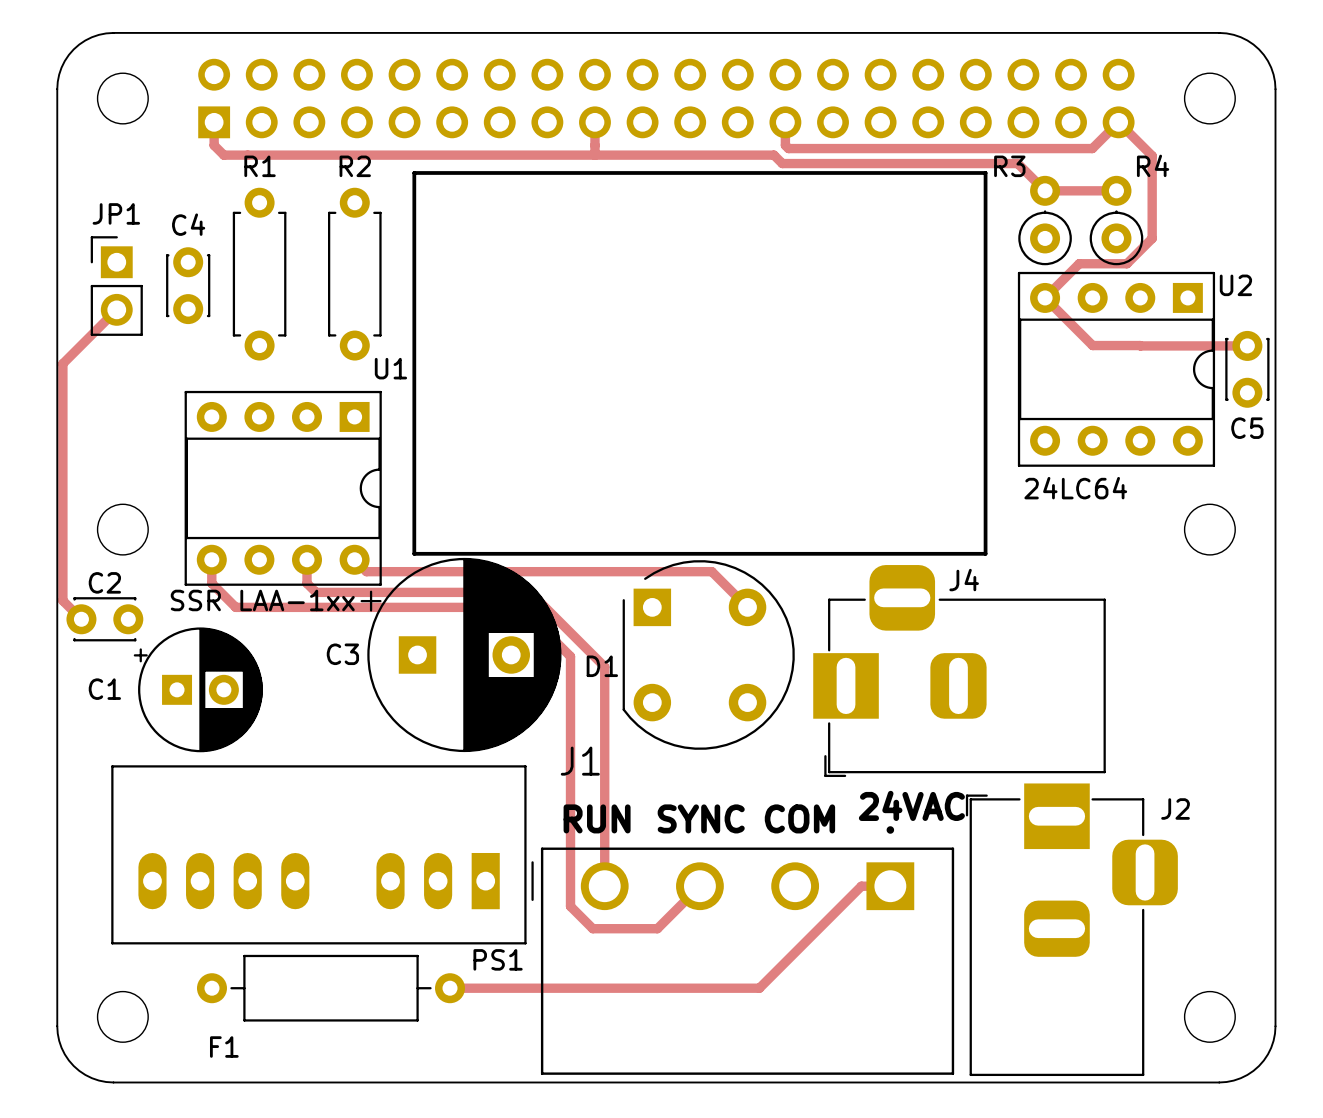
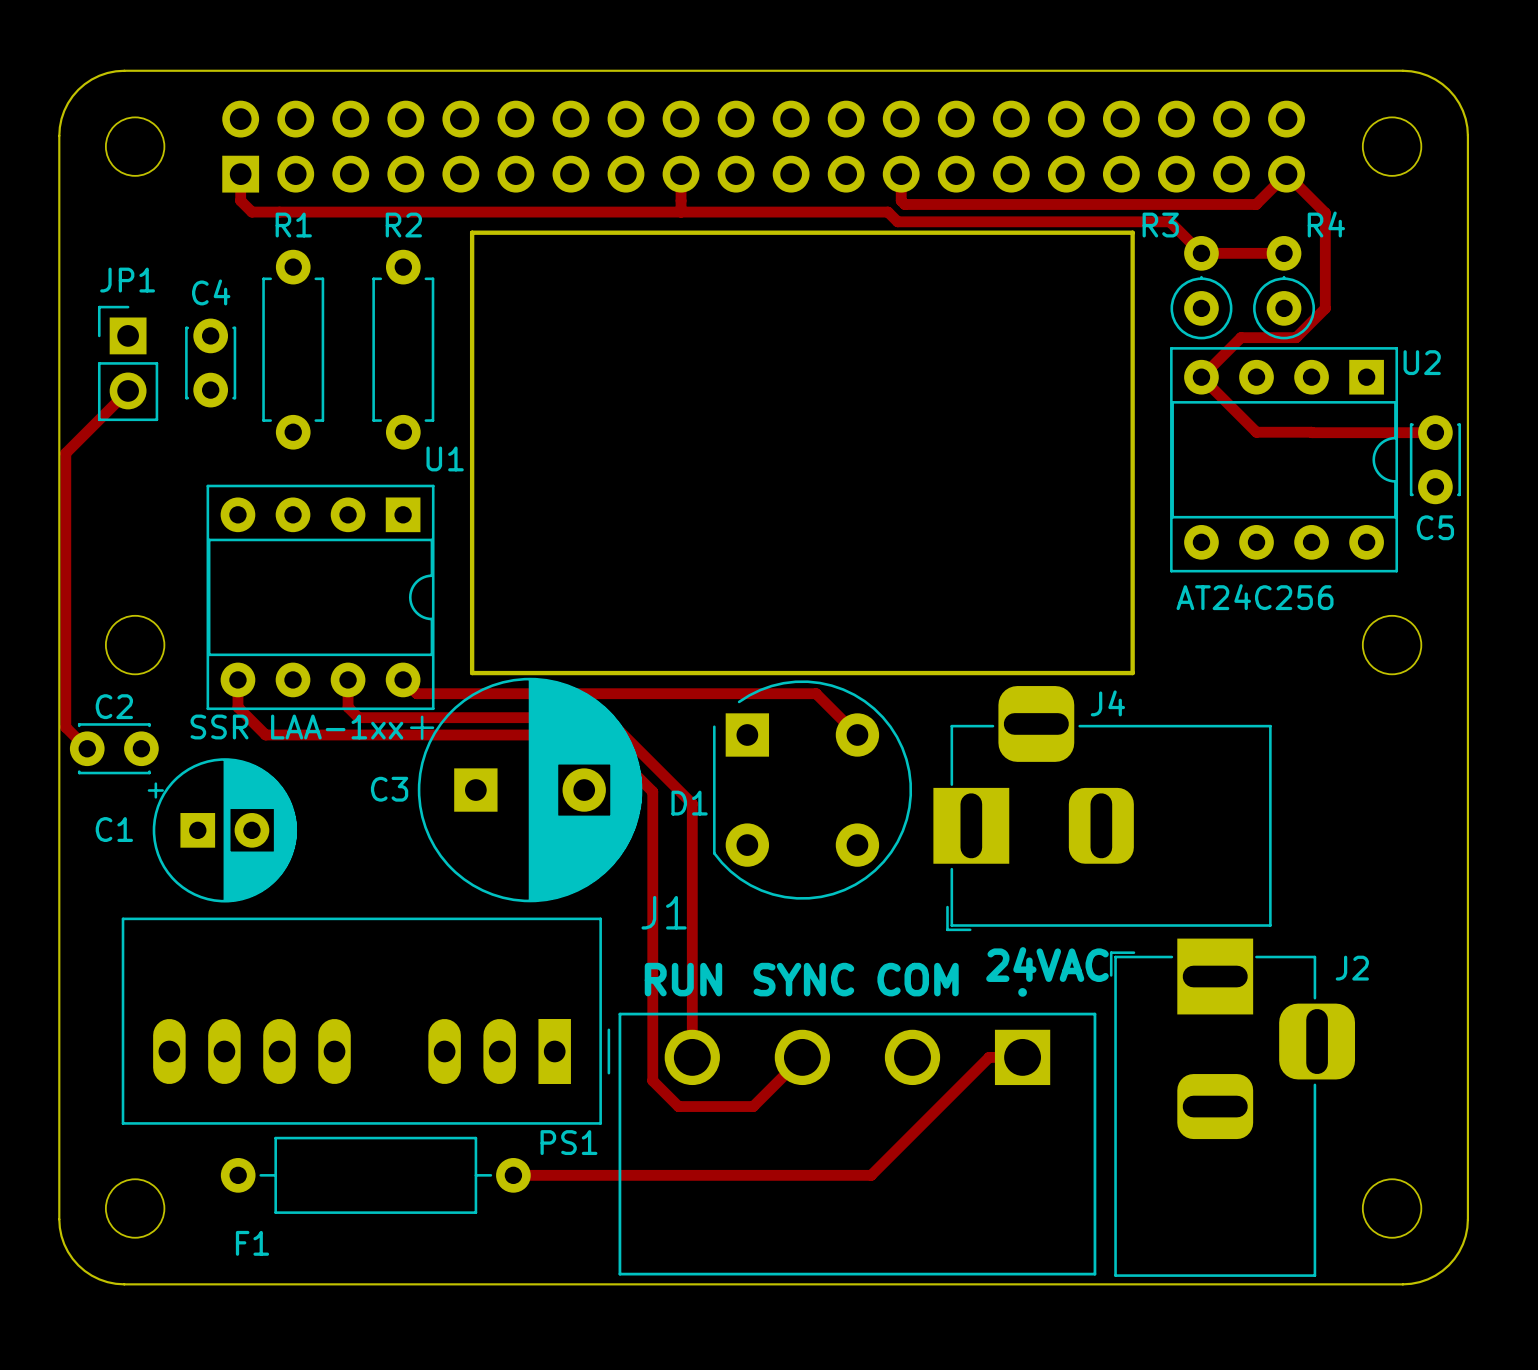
text: 24LC64 (1075, 488) -> AT24C256 (1255, 597)

